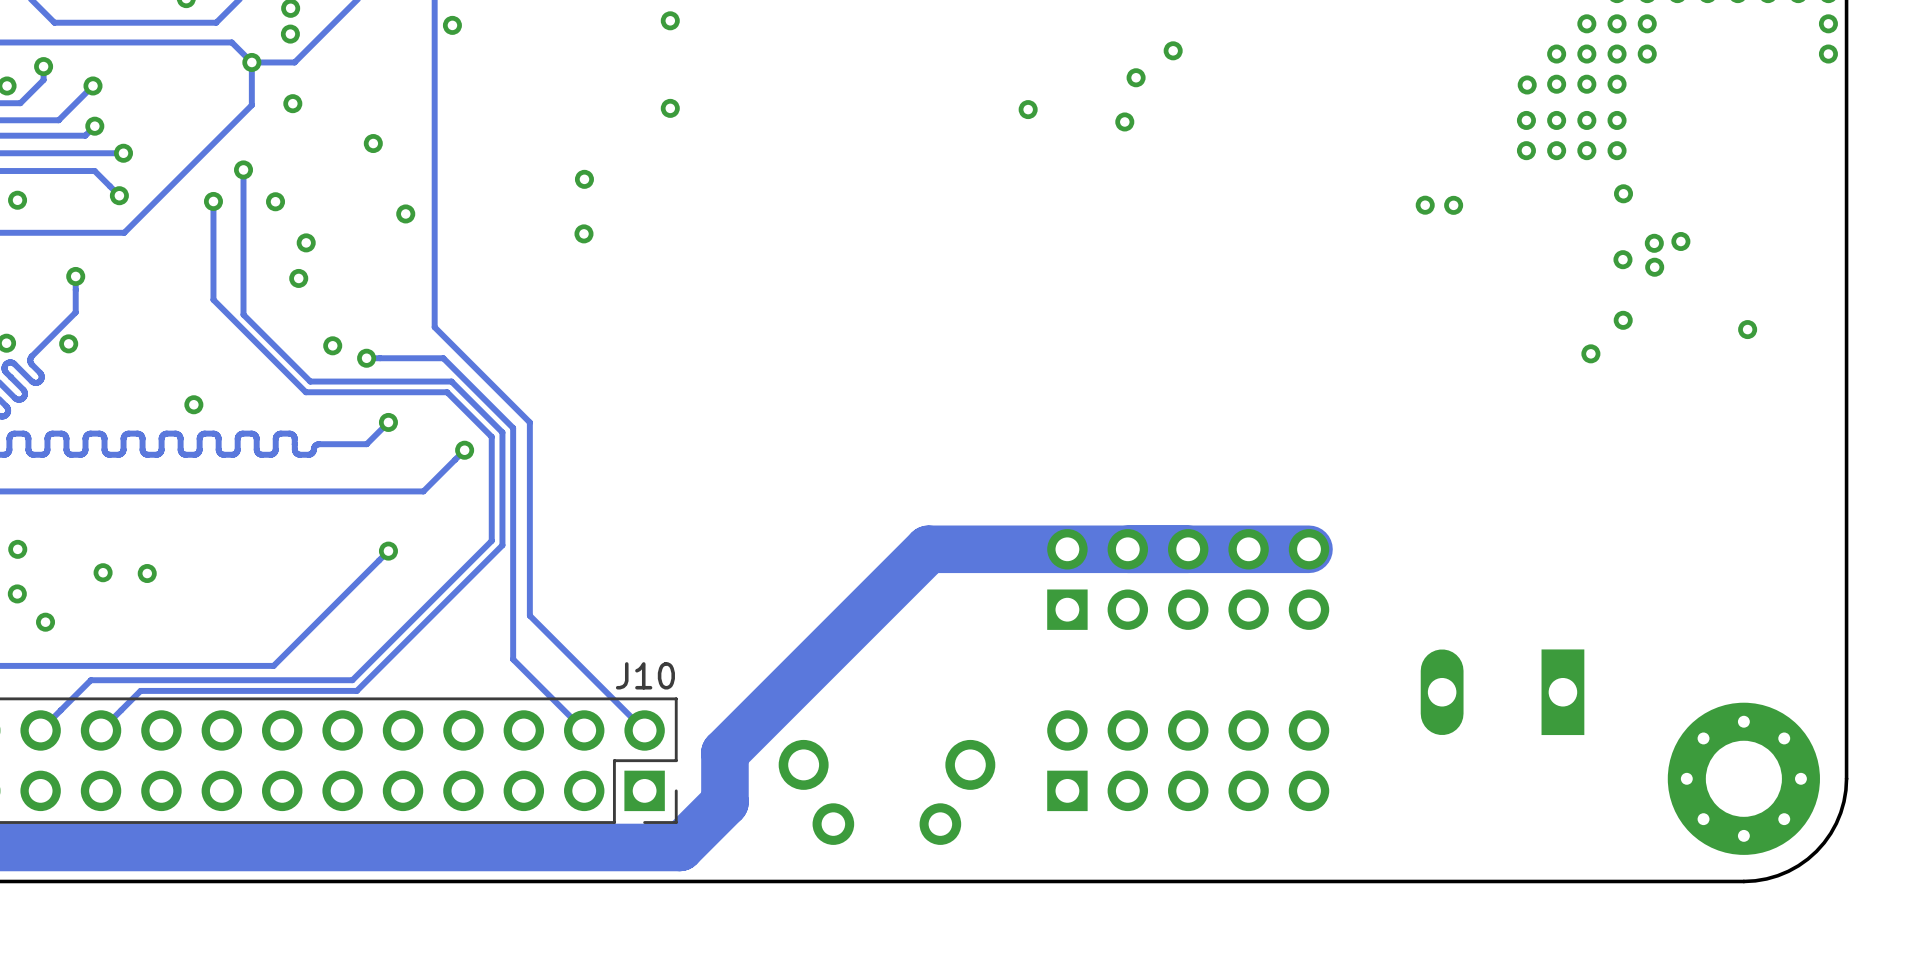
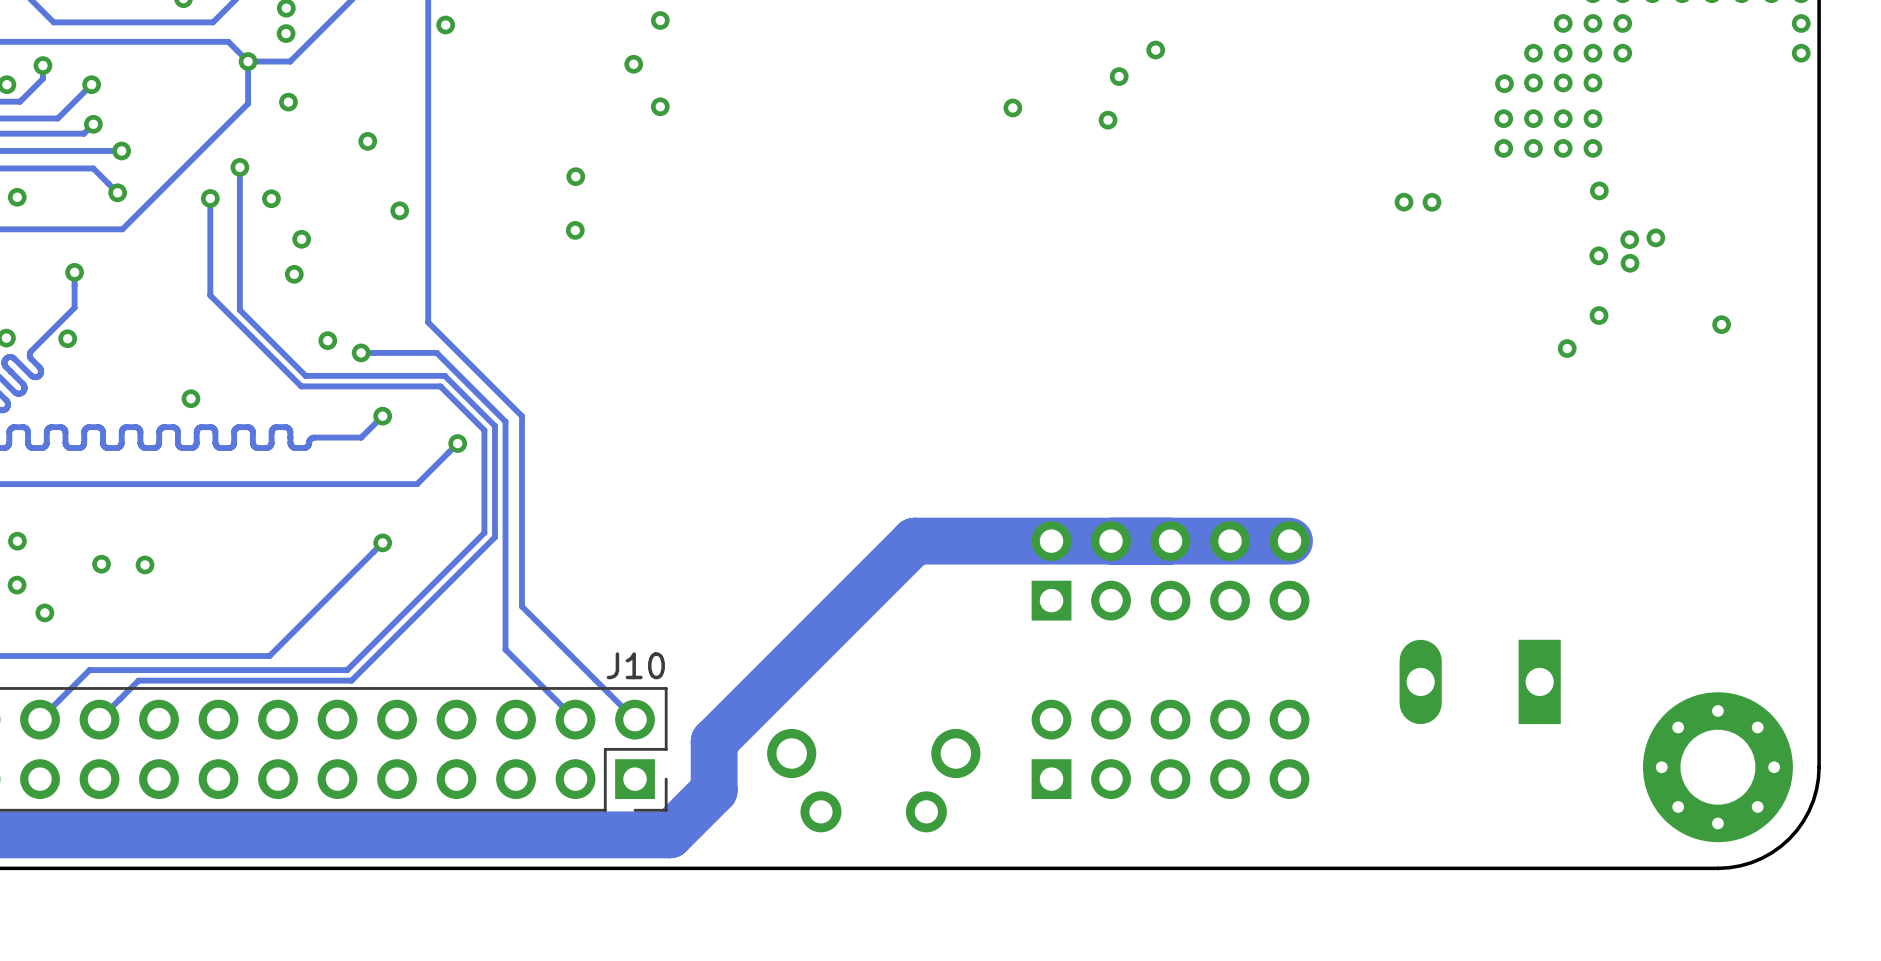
via: none -> (633, 64)

